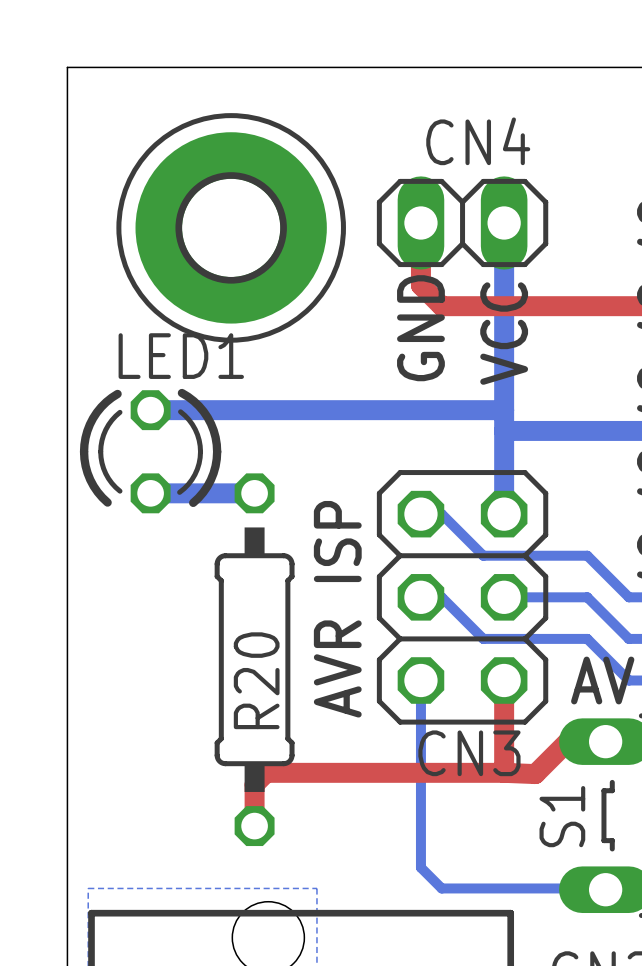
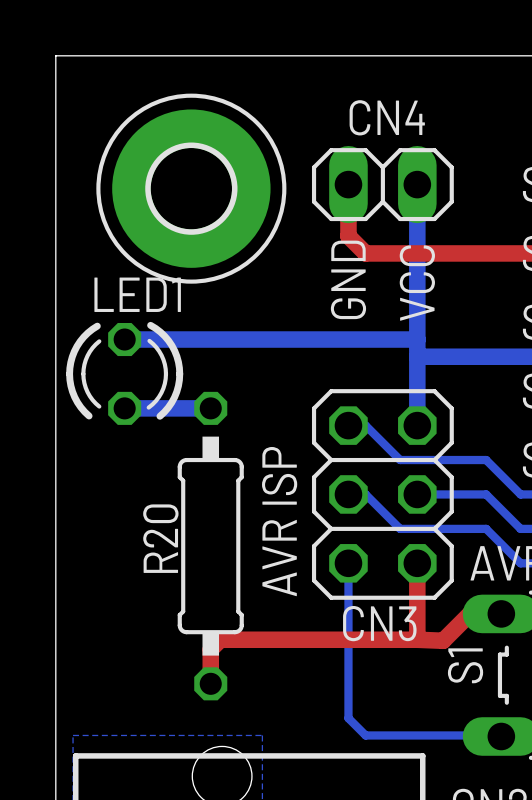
R20 name position: R20 (256, 680) -> R20 (160, 538)

